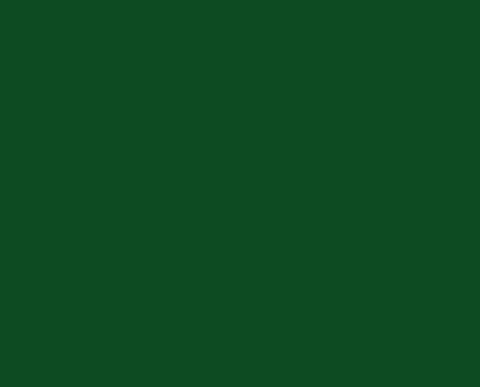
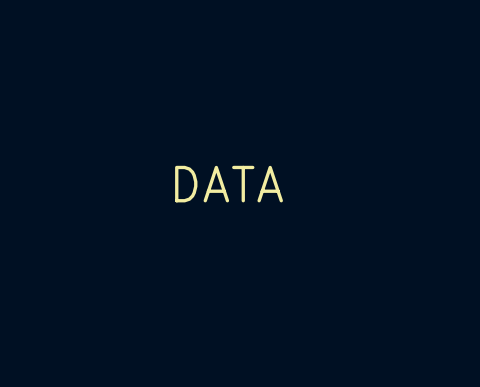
text: none -> DATA (229, 184)

